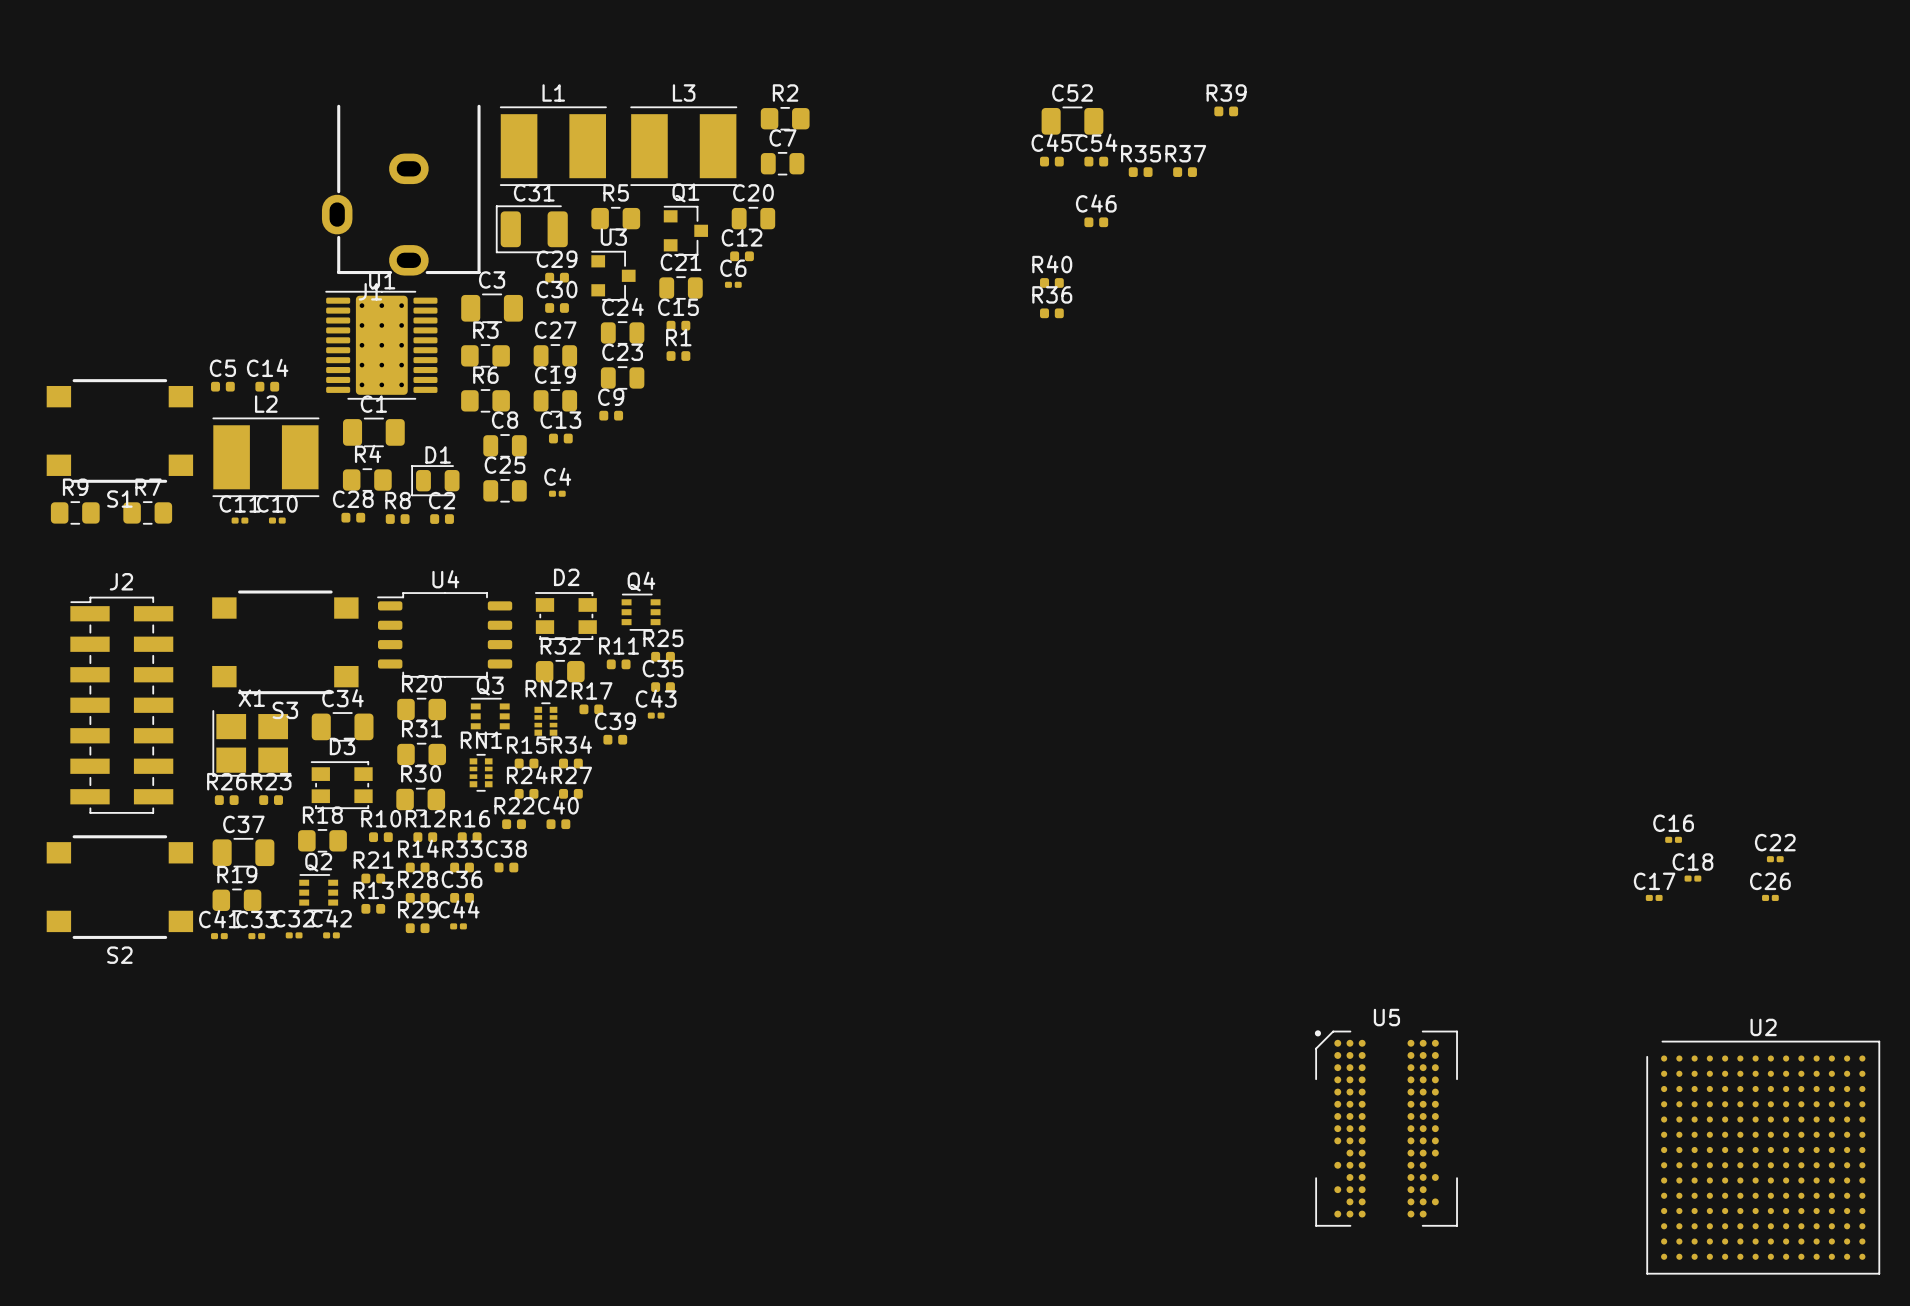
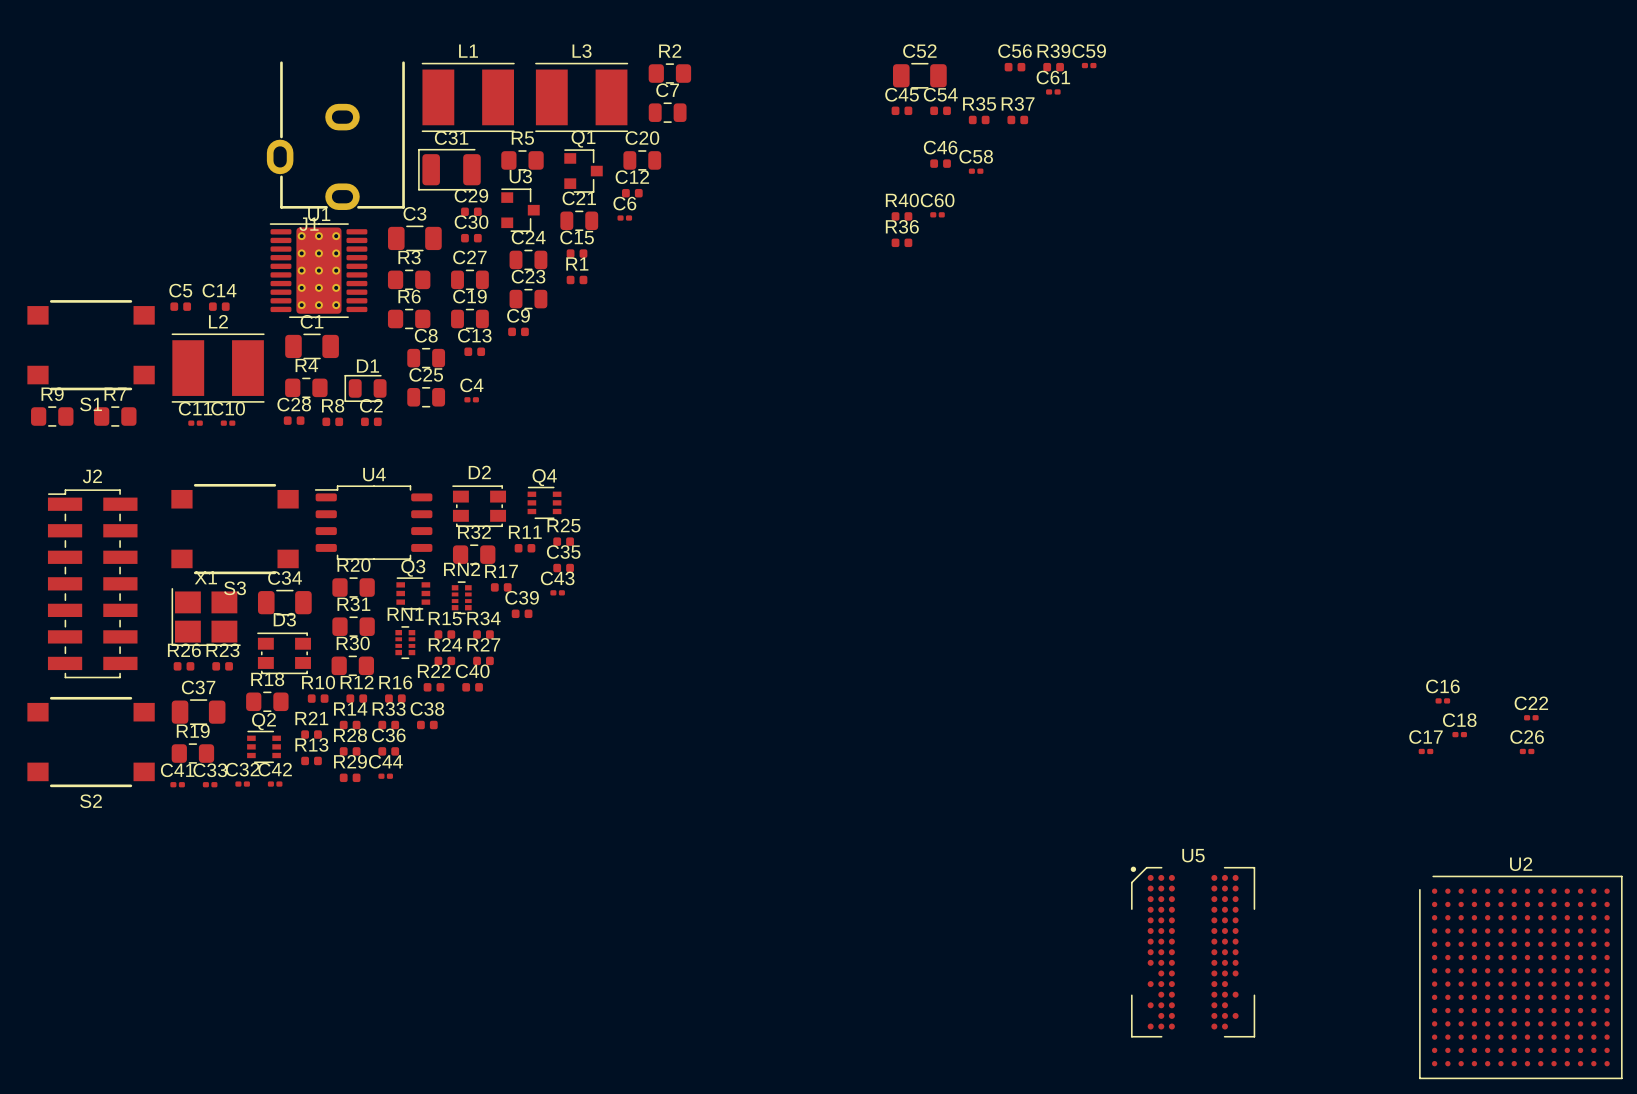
C59: none -> (1089, 65)
C56: none -> (1015, 67)
C61: none -> (1053, 91)
C58: none -> (976, 171)
C60: none -> (937, 214)

